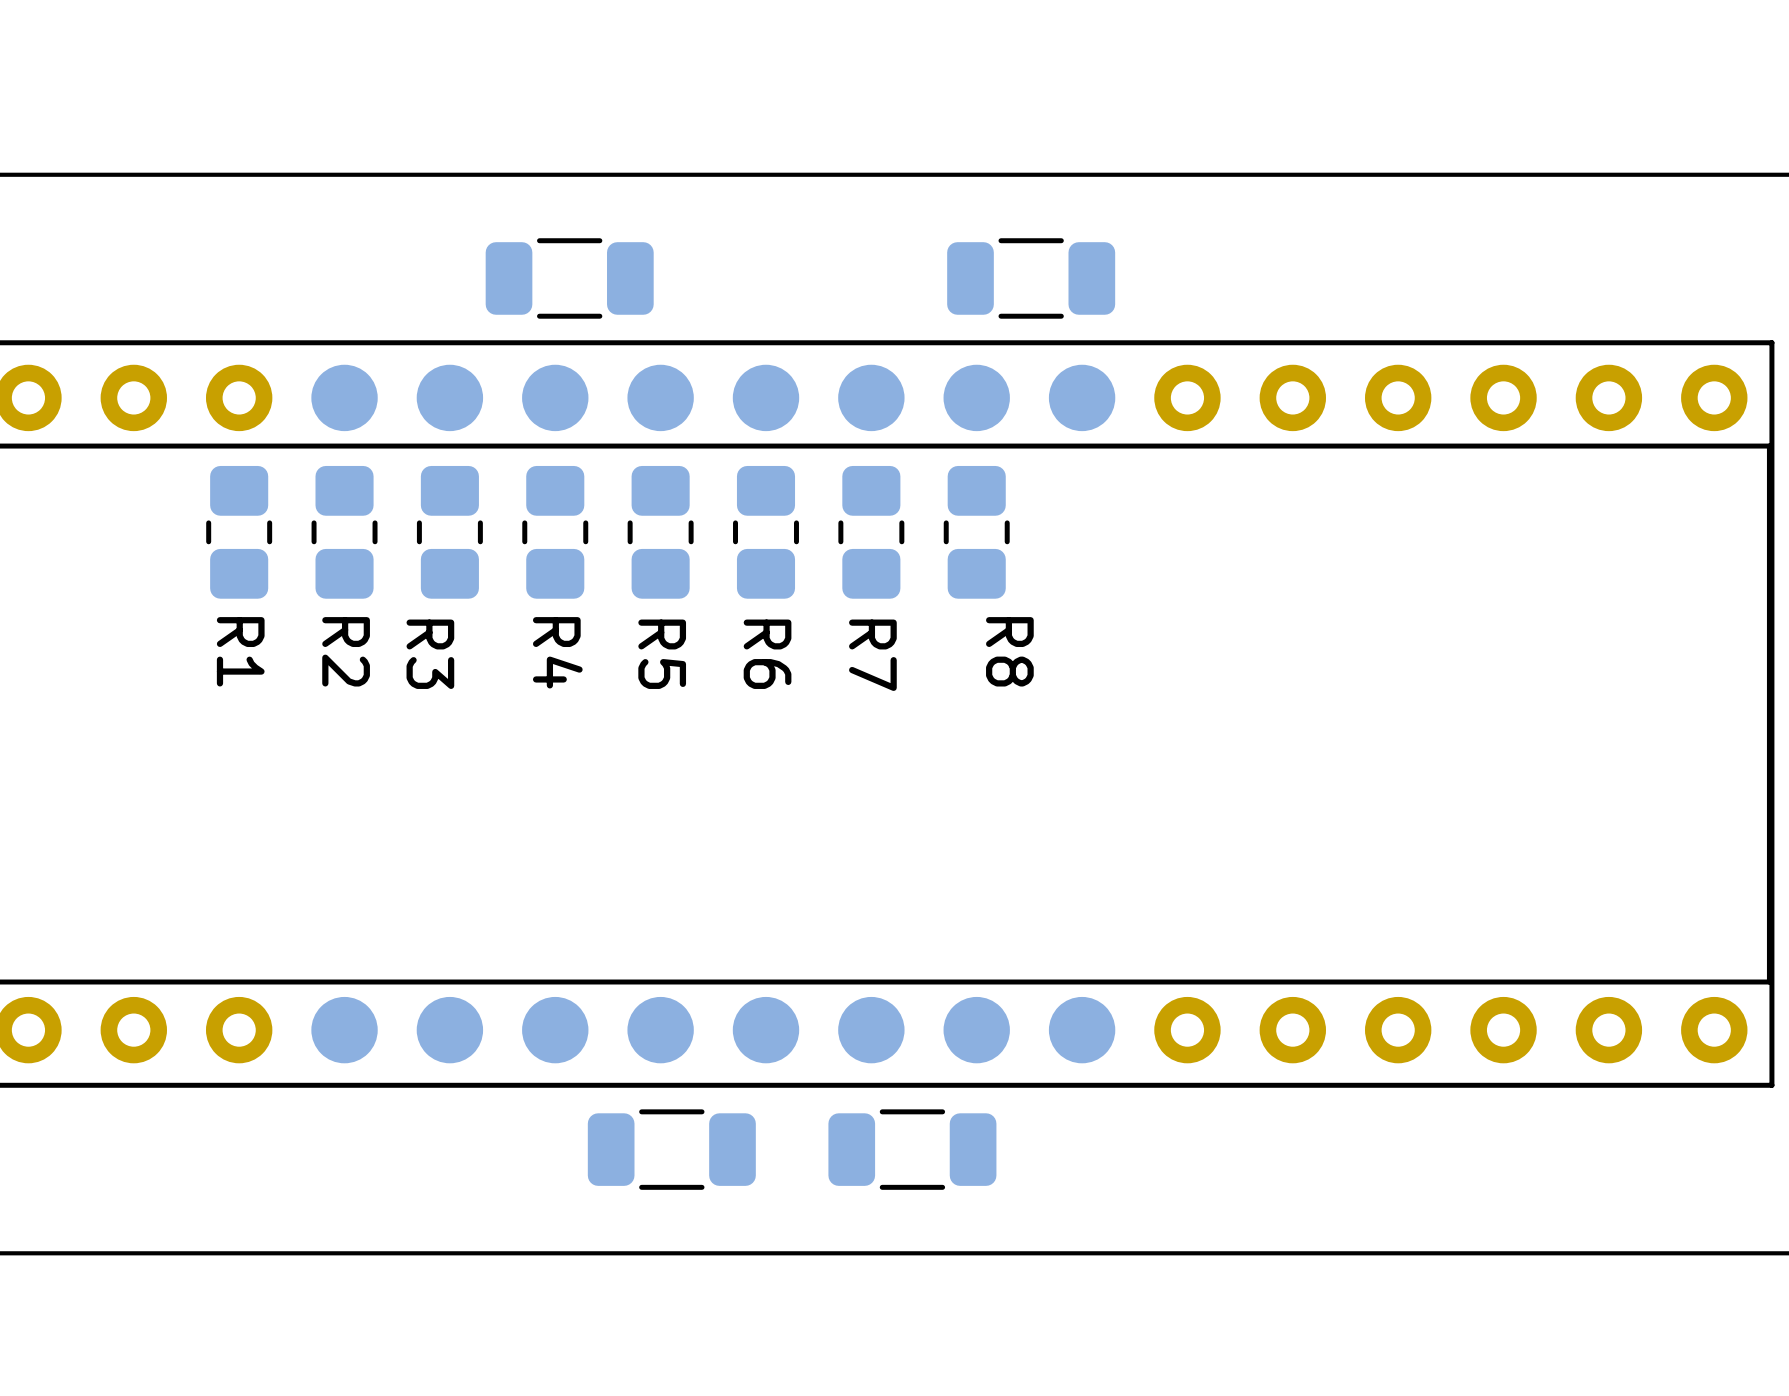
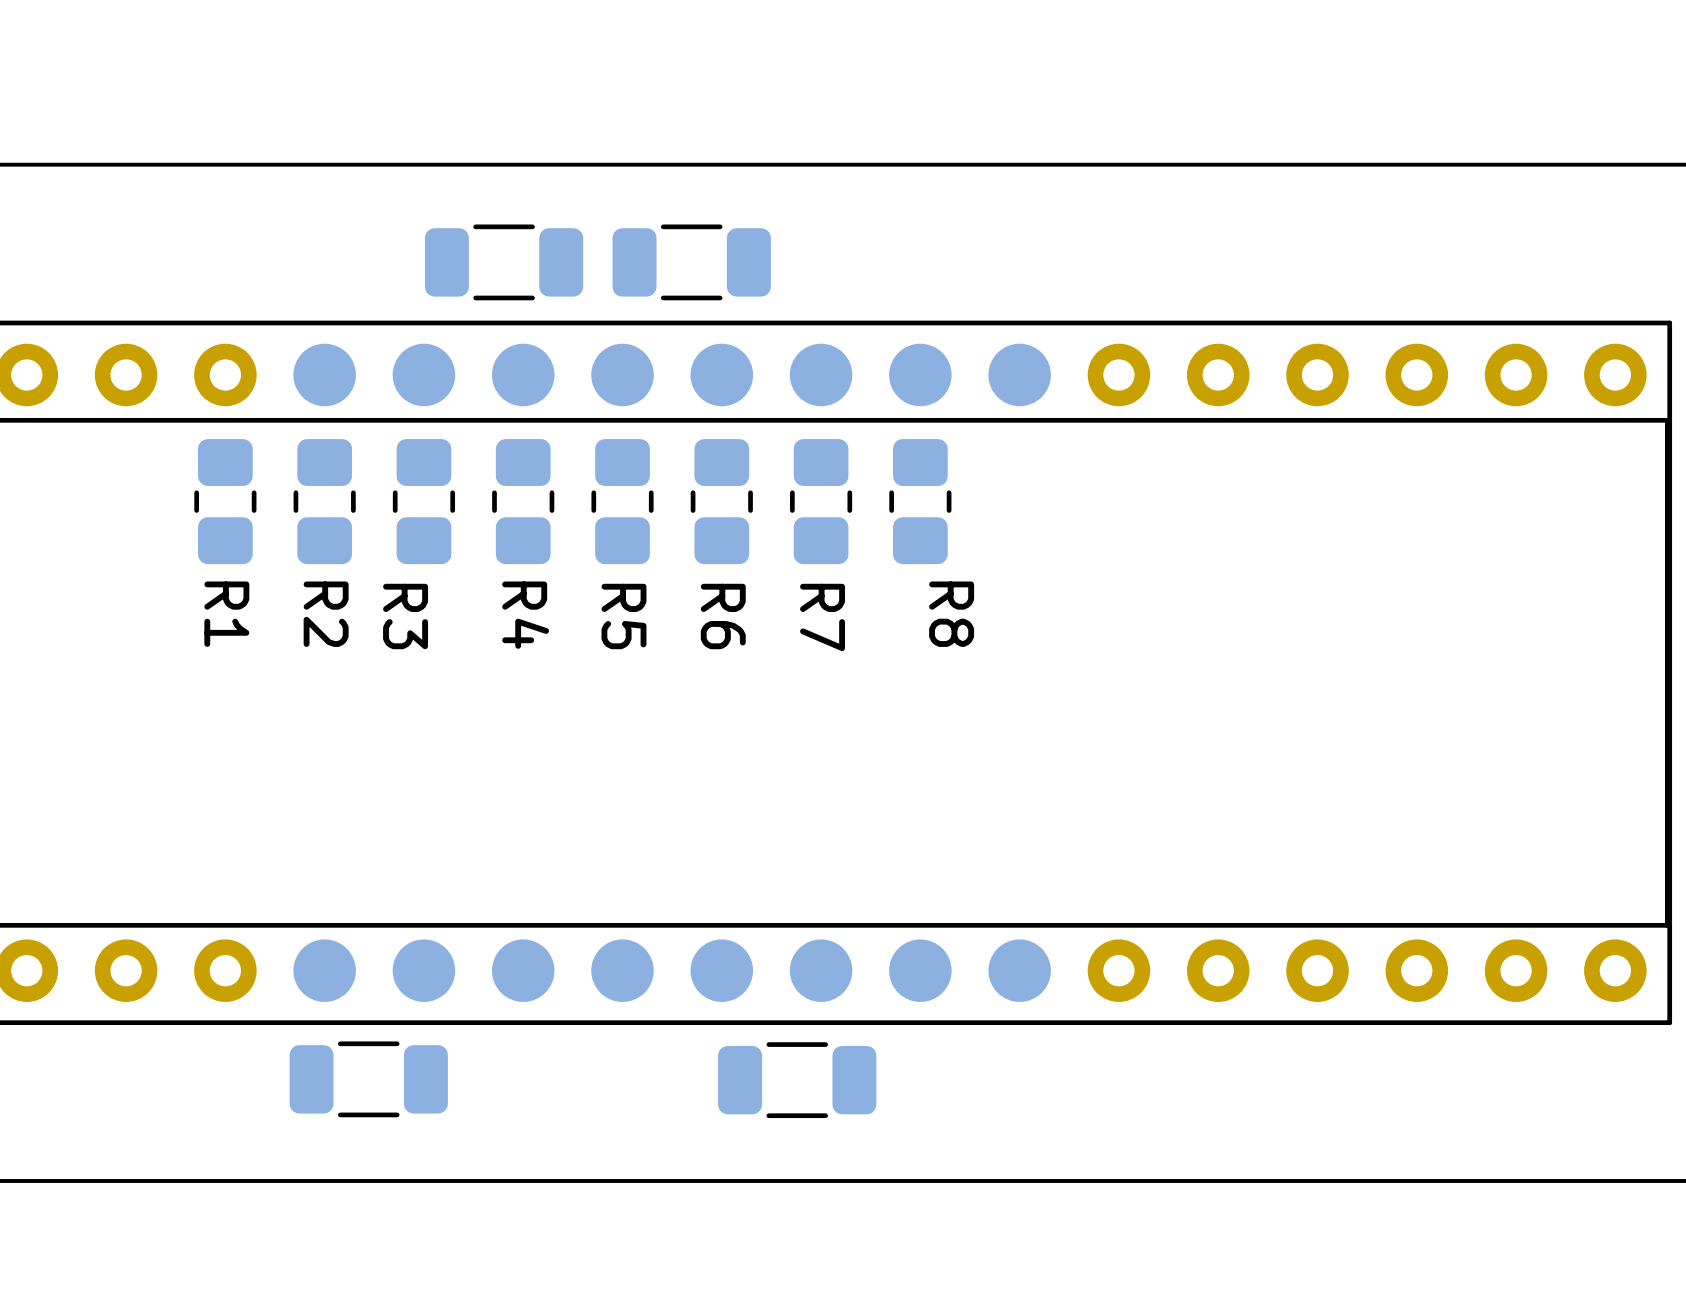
part position: (569, 278) -> (504, 262)
part position: (1031, 278) -> (691, 262)
part: none -> (368, 1079)
part: (671, 1149) -> none
part position: (912, 1149) -> (797, 1080)

